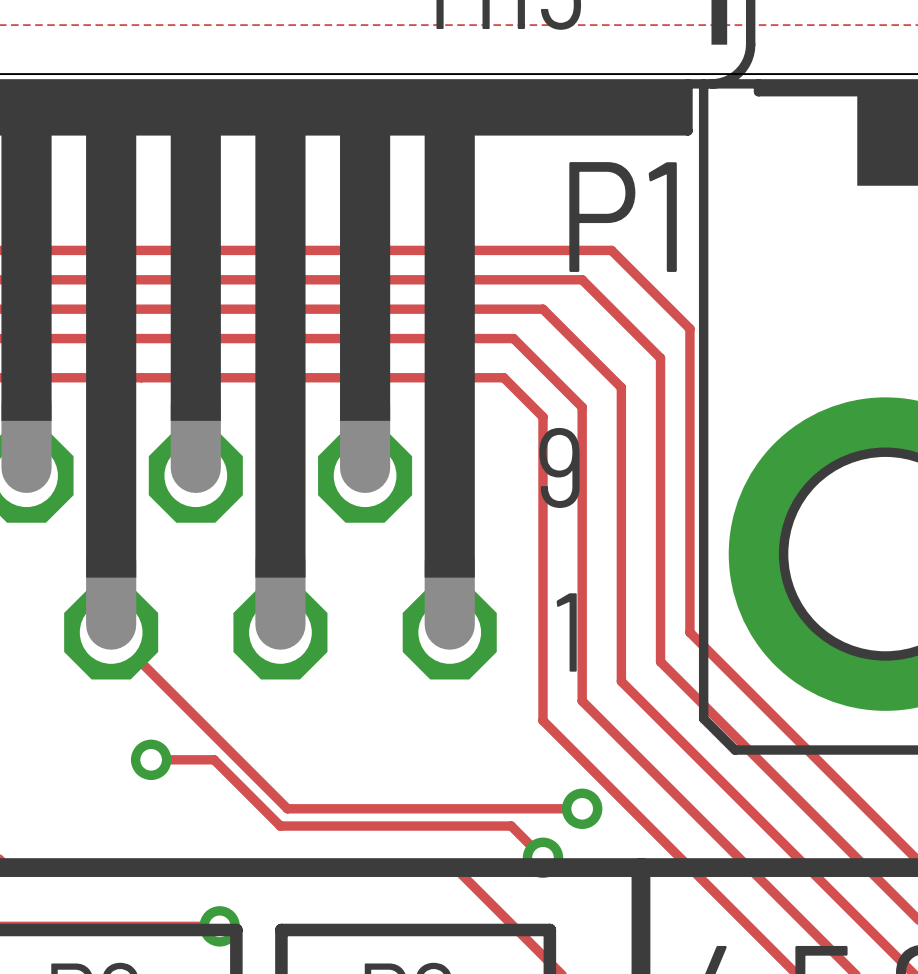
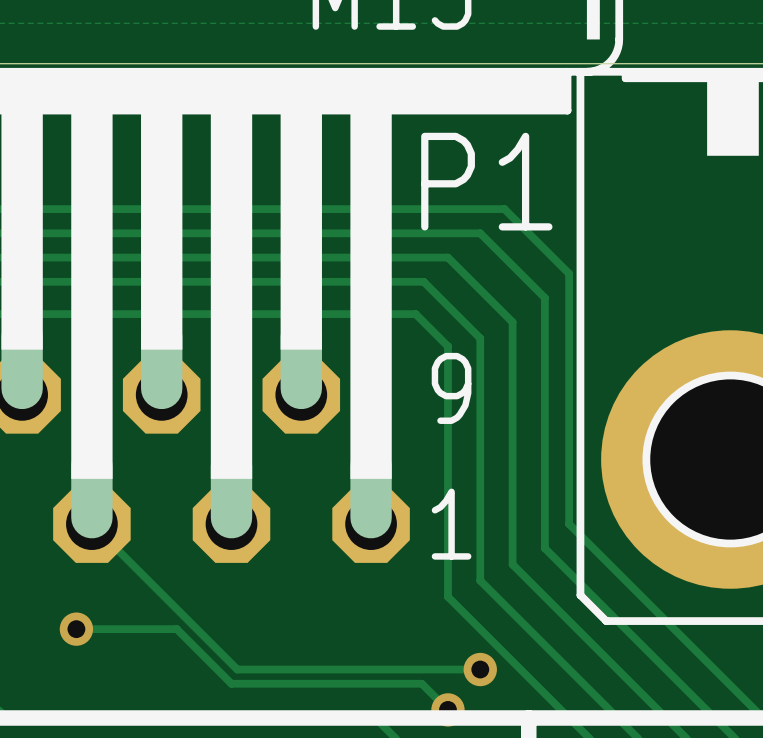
track: none -> (76, 629) (124, 629)
via position: (151, 759) -> (76, 629)

